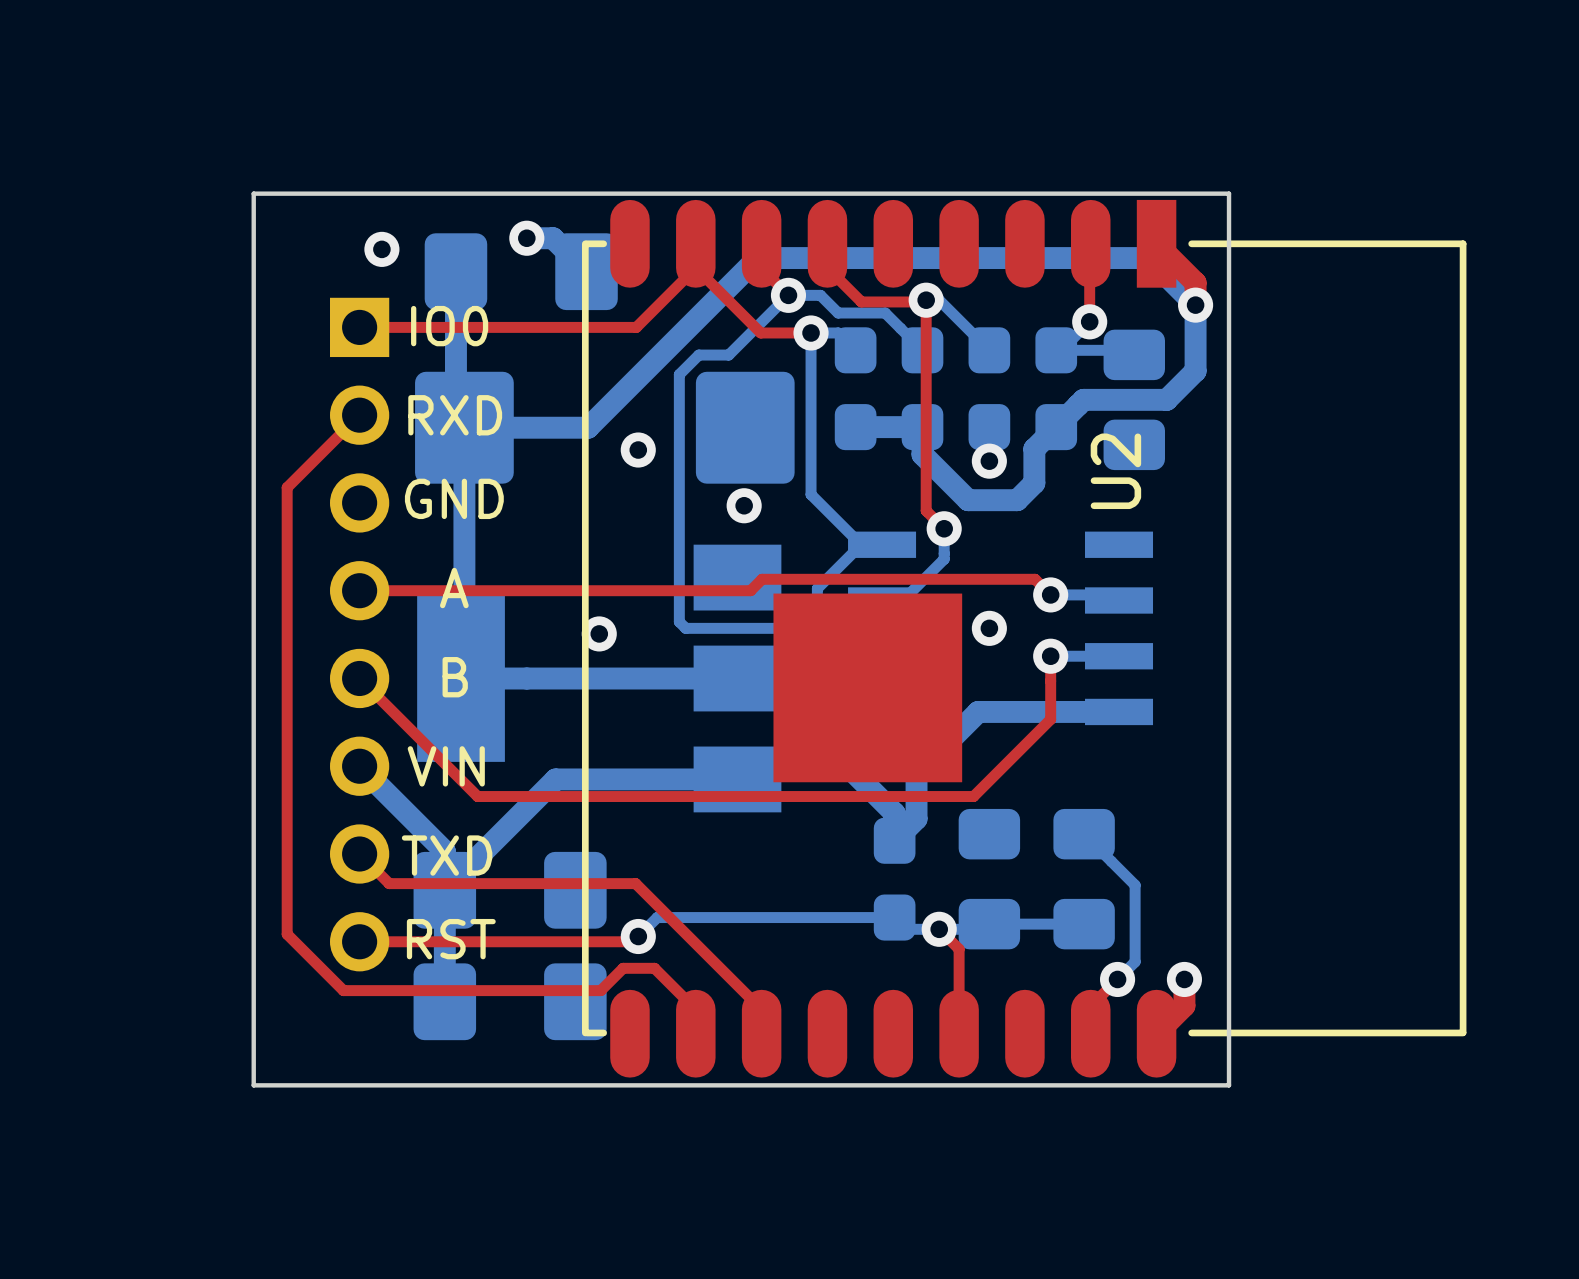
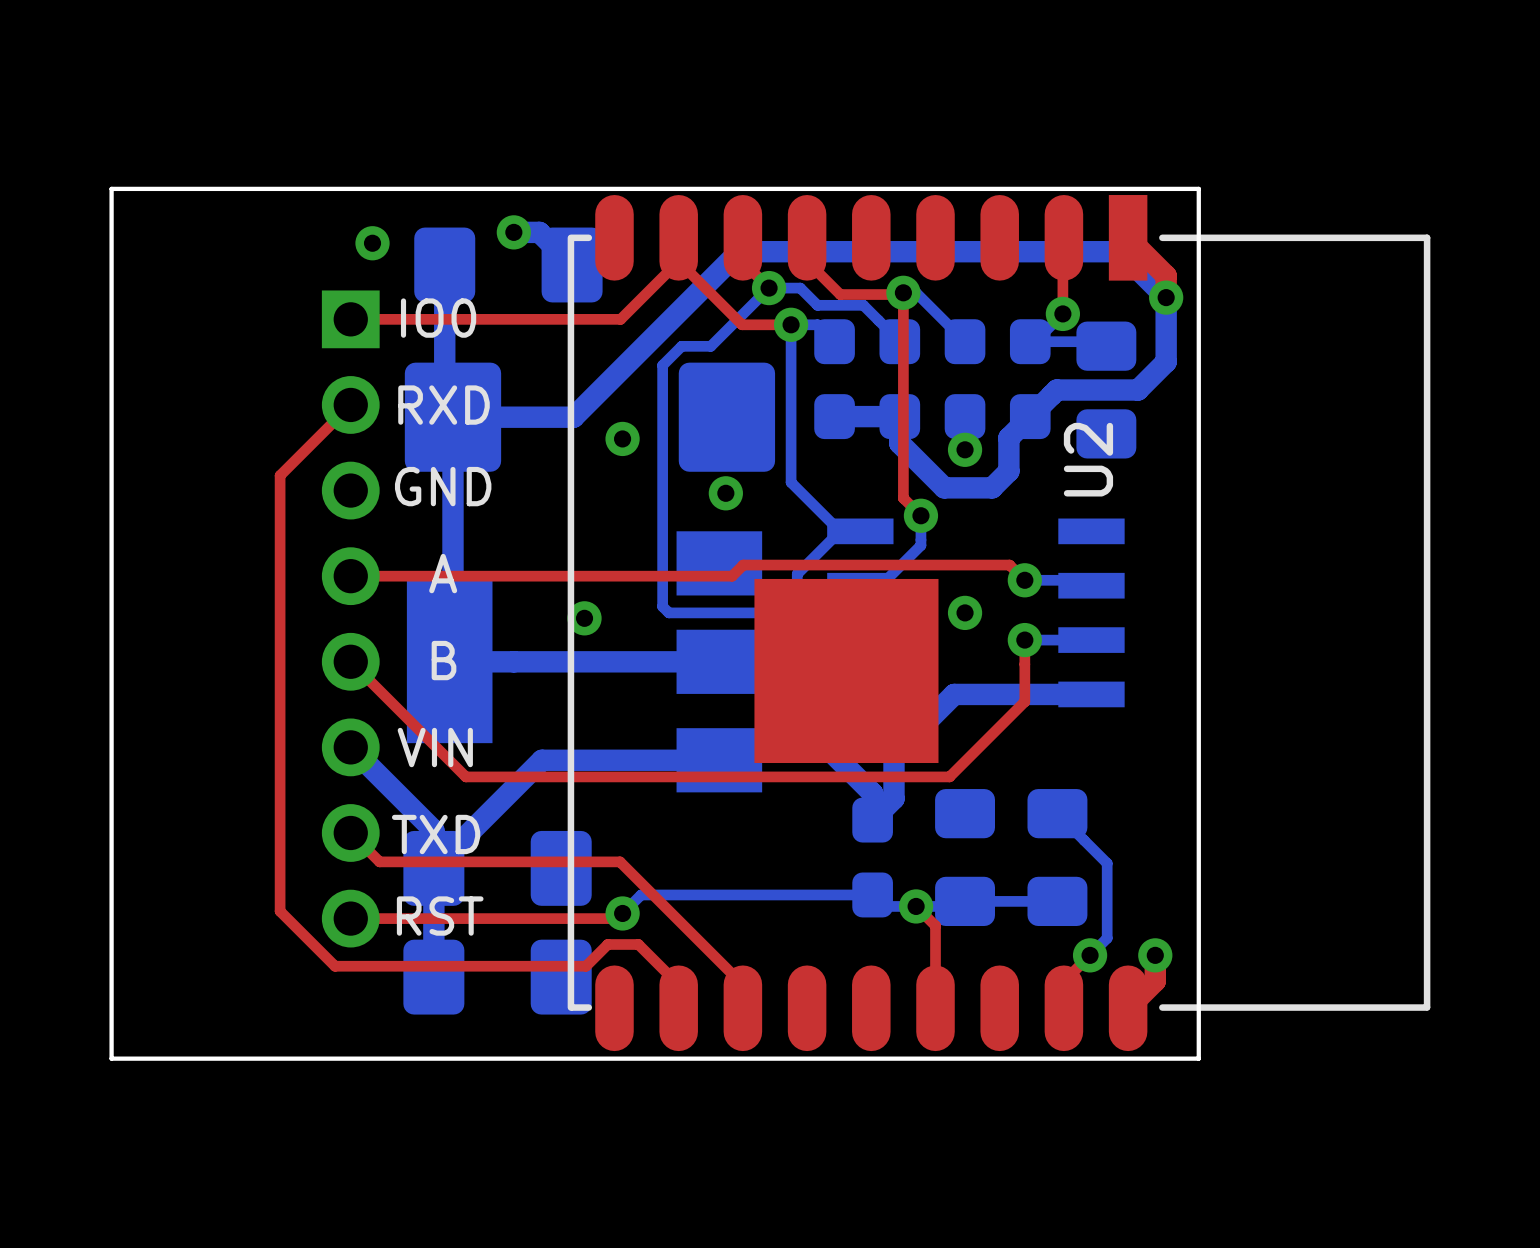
board edge: (253, 193) (253, 1085) -> (247, 188) (111, 188) (111, 1058) (247, 1058)

